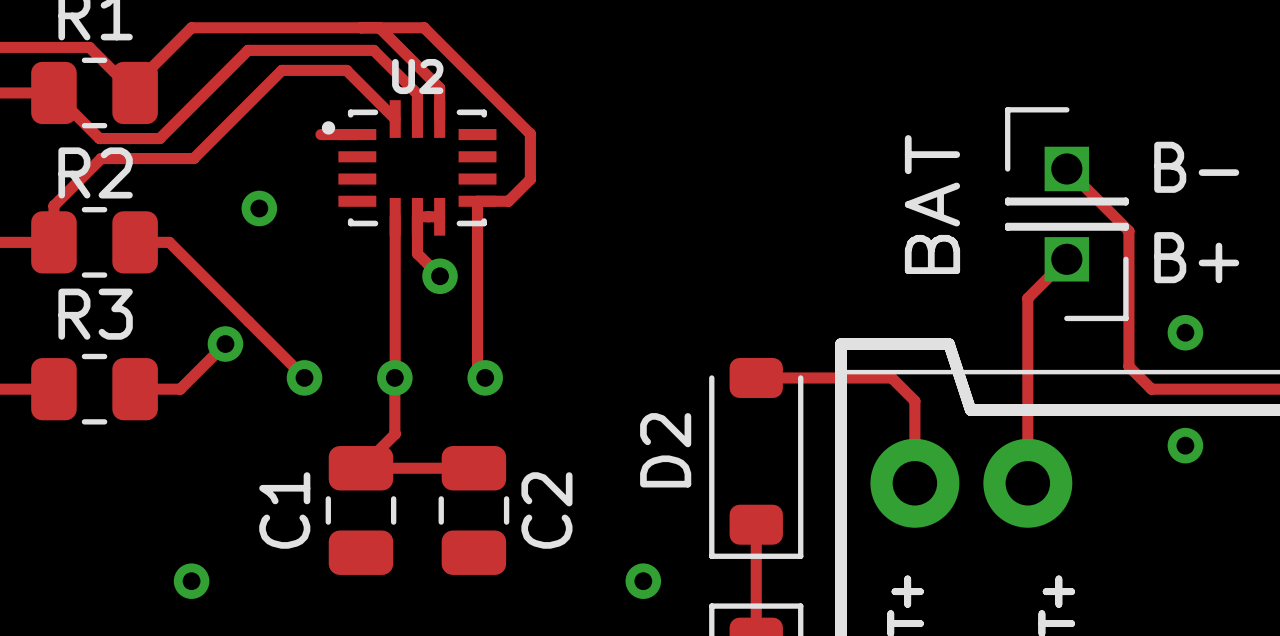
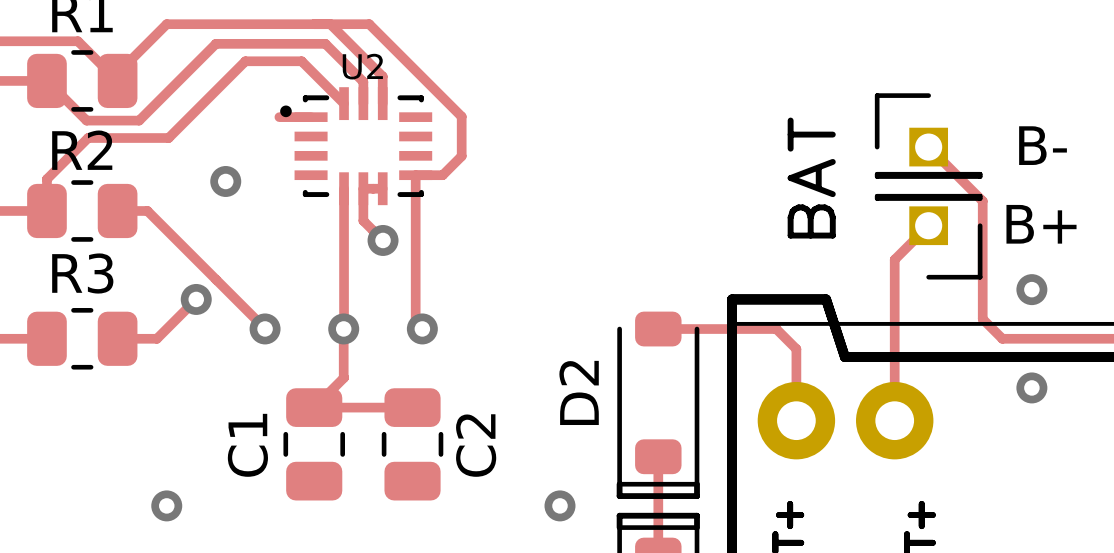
line: none -> (619, 484) (619, 496) (697, 496) (697, 484)
line: none -> (619, 527) (619, 515) (697, 515) (697, 527)

